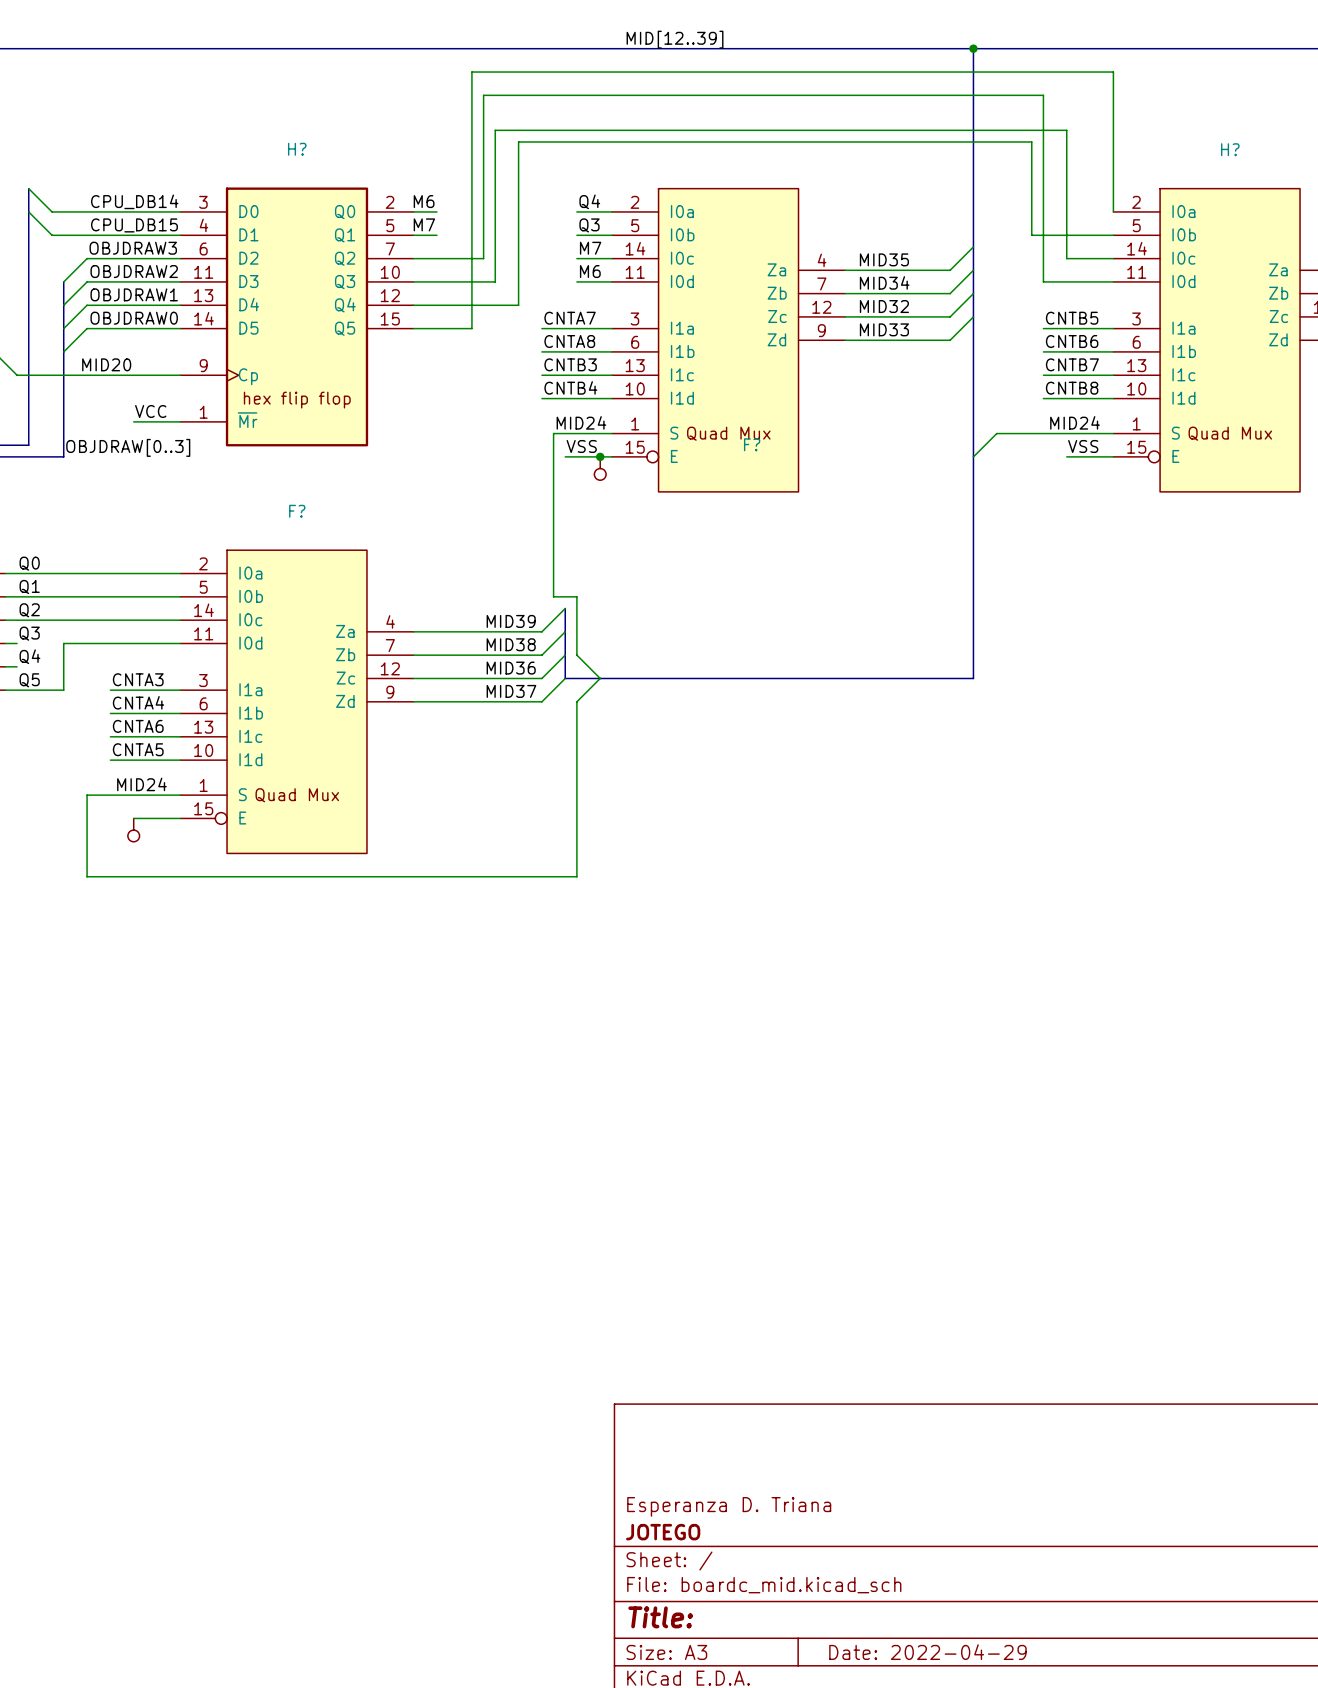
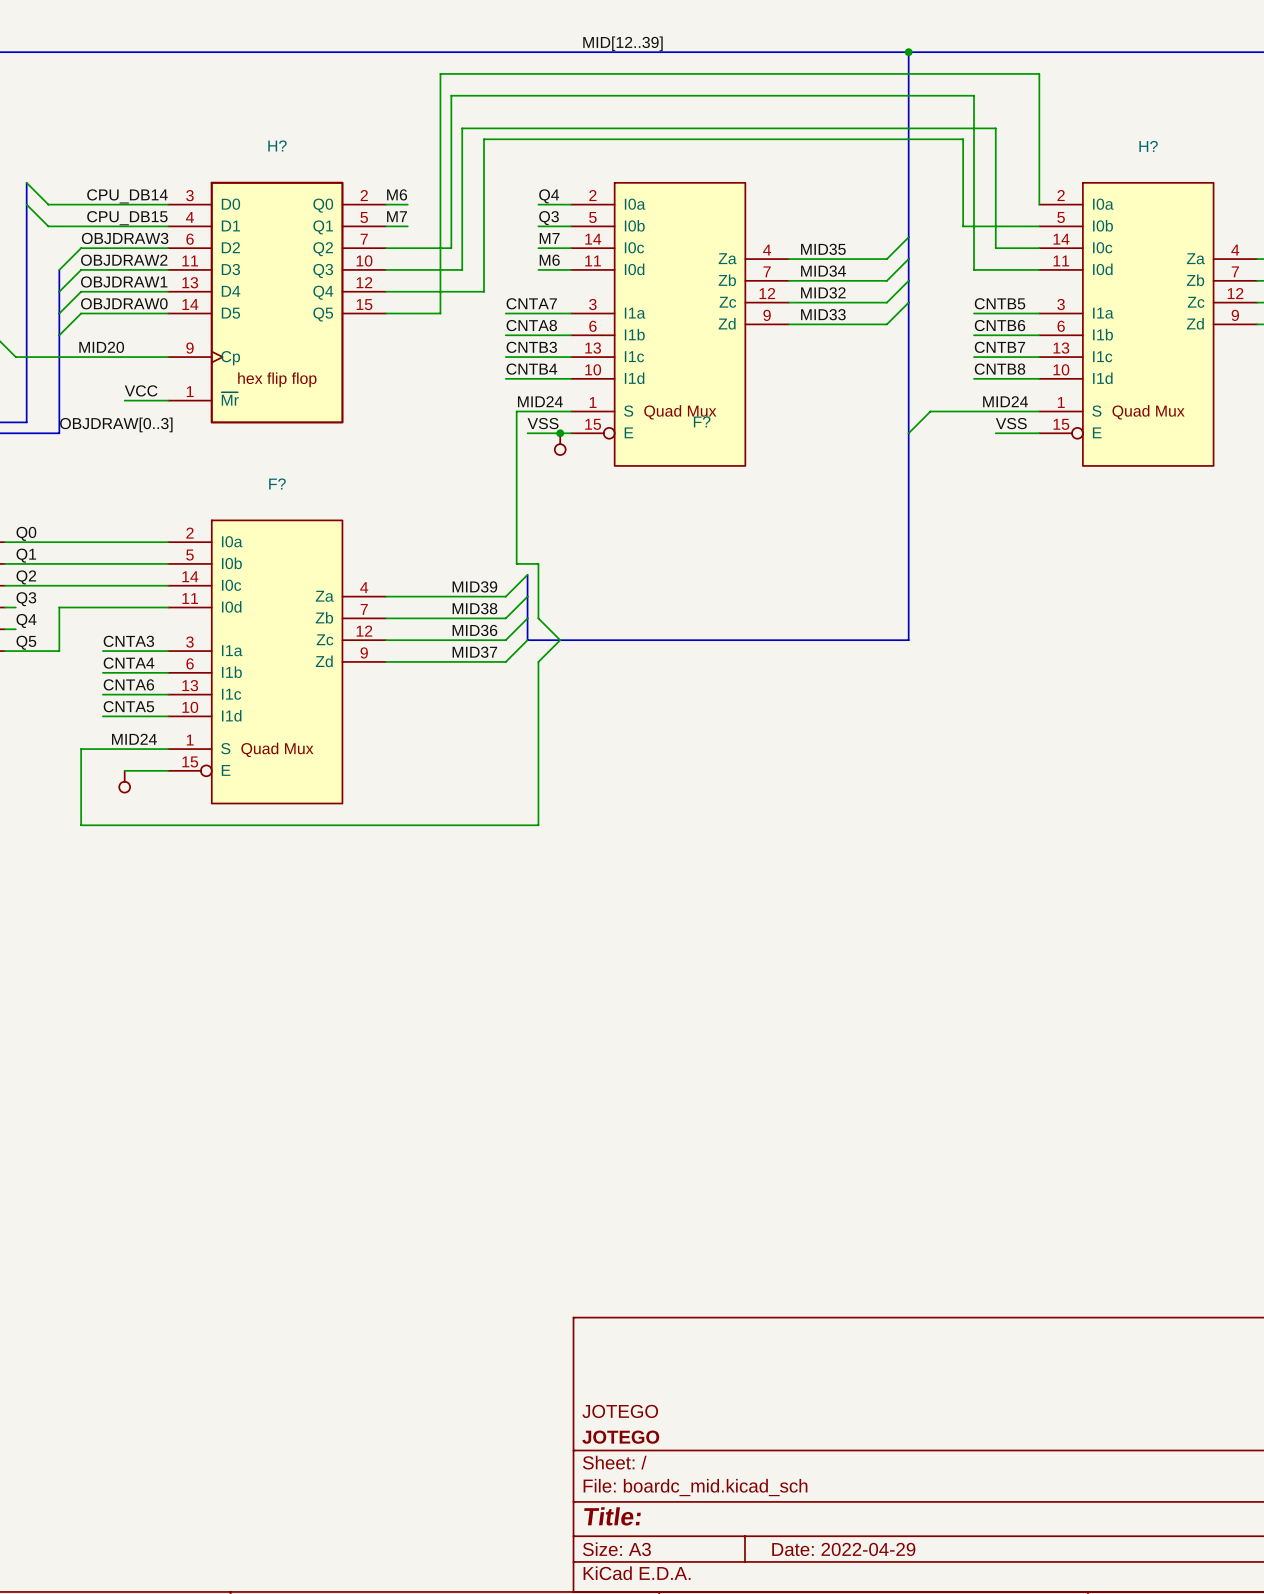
title block: Esperanza D. Triana (729, 1506) -> JOTEGO (620, 1411)

